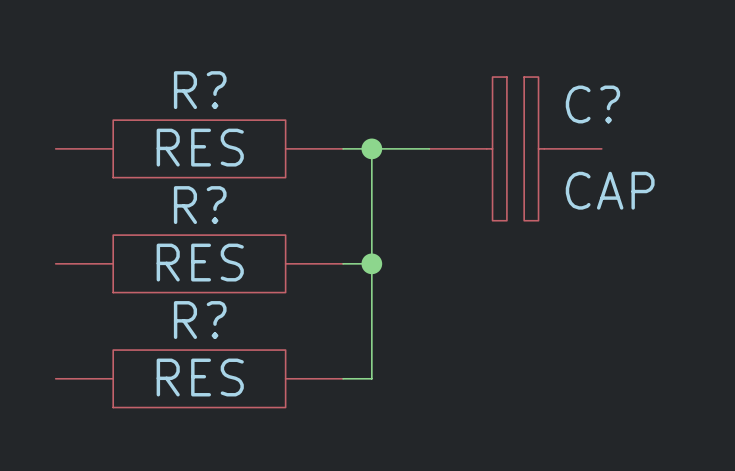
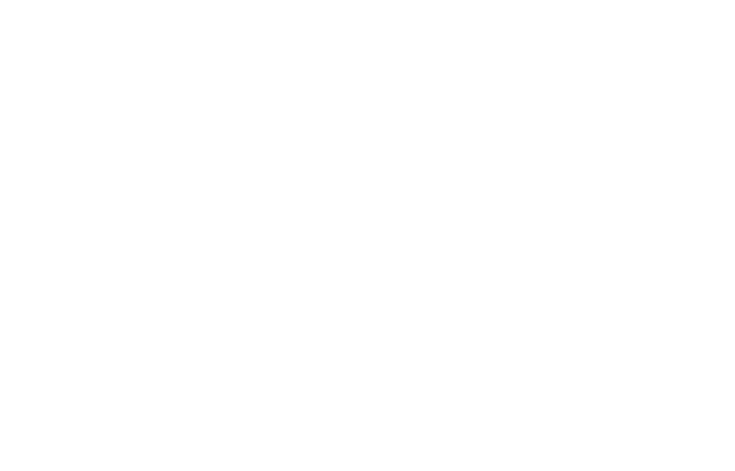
R?: RES (199, 148) -> none
wire: (343, 148) (429, 148) -> none
wire: (371, 148) (371, 378) (343, 378) -> none
junction: (371, 148) -> none
C?: CAP (515, 148) -> none
R?: RES (199, 263) -> none
wire: (343, 263) (371, 263) -> none
junction: (371, 263) -> none
R?: RES (199, 378) -> none

